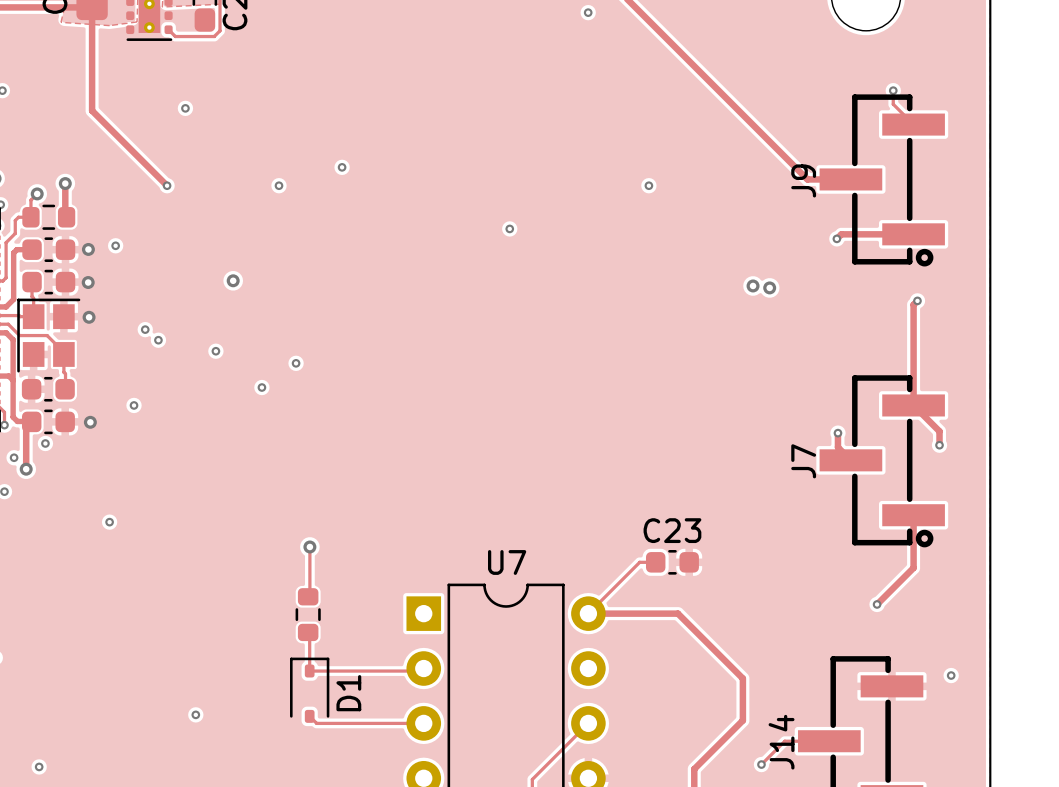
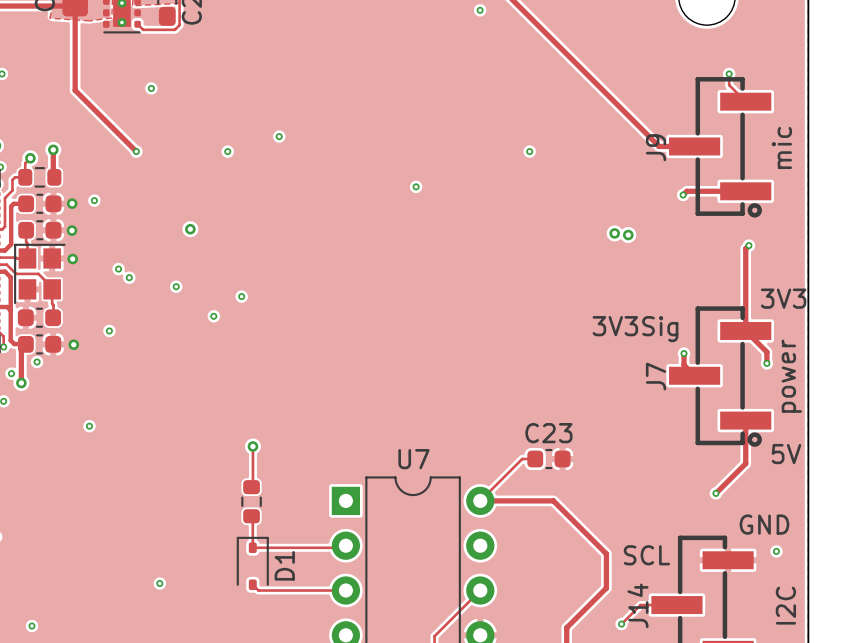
text: none -> mic (781, 147)
text: none -> 3V3 (783, 298)
text: none -> 3V3Sig (635, 329)
text: none -> power (791, 376)
text: none -> 5V (786, 454)
text: none -> GND (764, 524)
text: none -> SCL (646, 555)
text: none -> I2C (785, 605)

